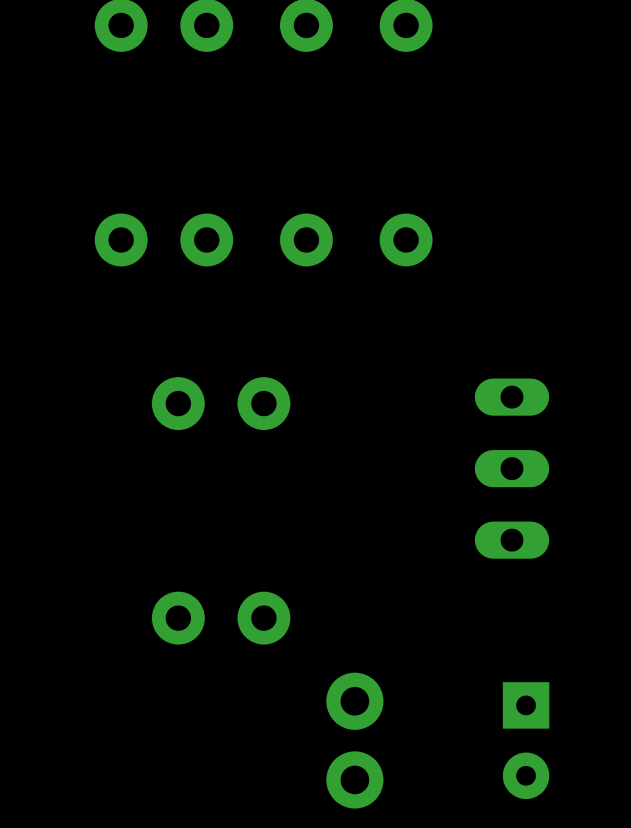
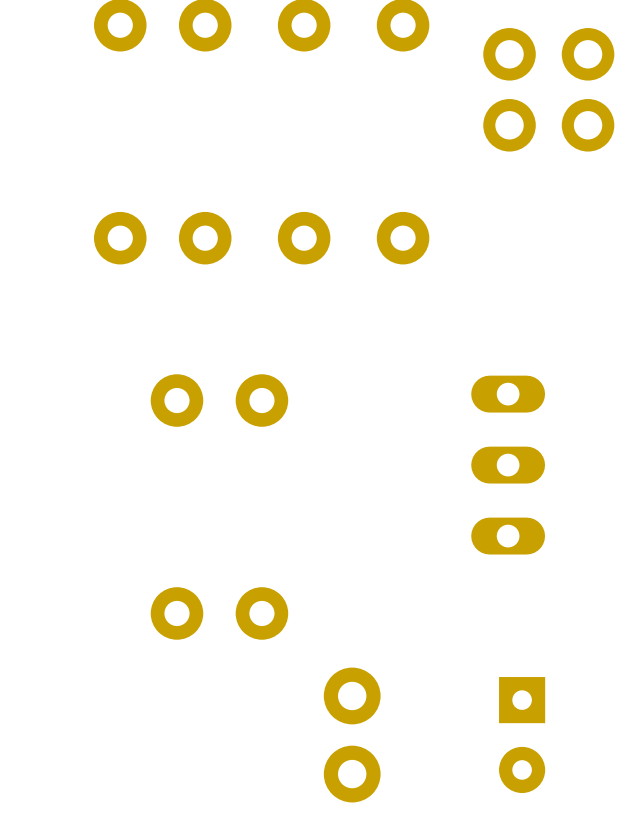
part: none -> (509, 89)
part: none -> (588, 89)

